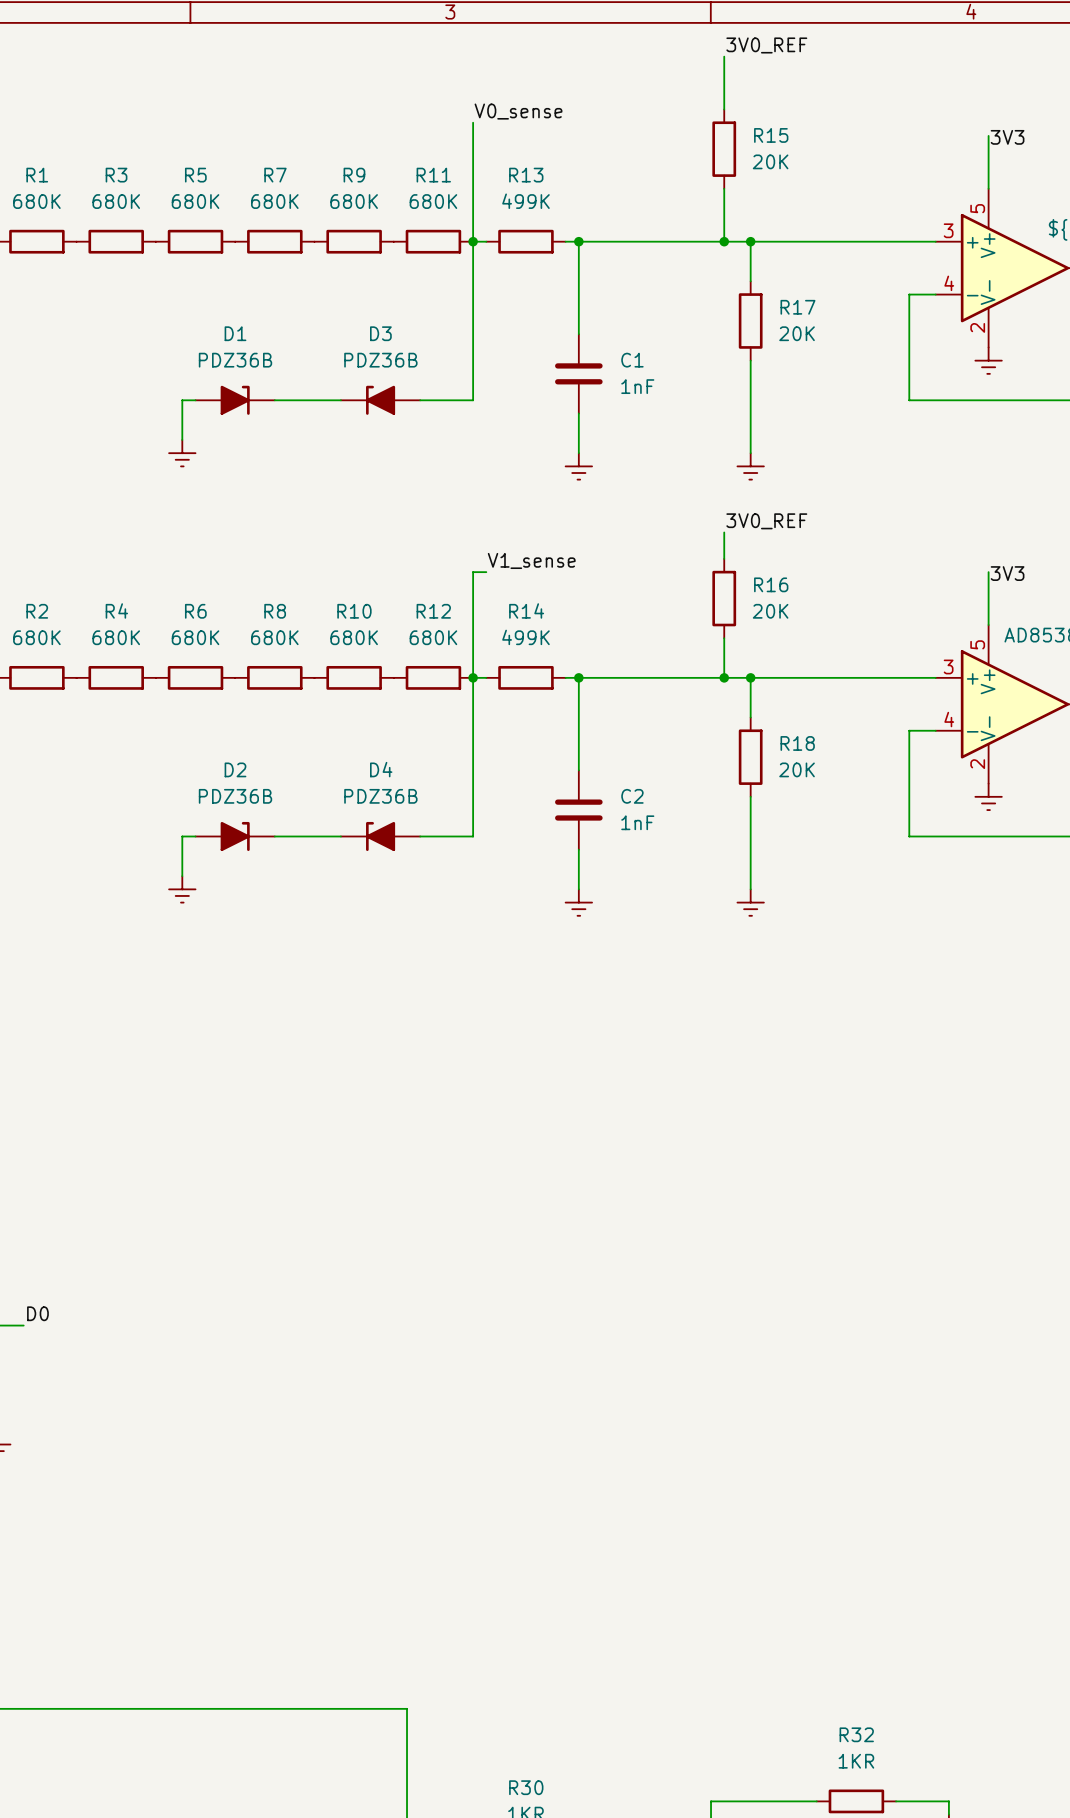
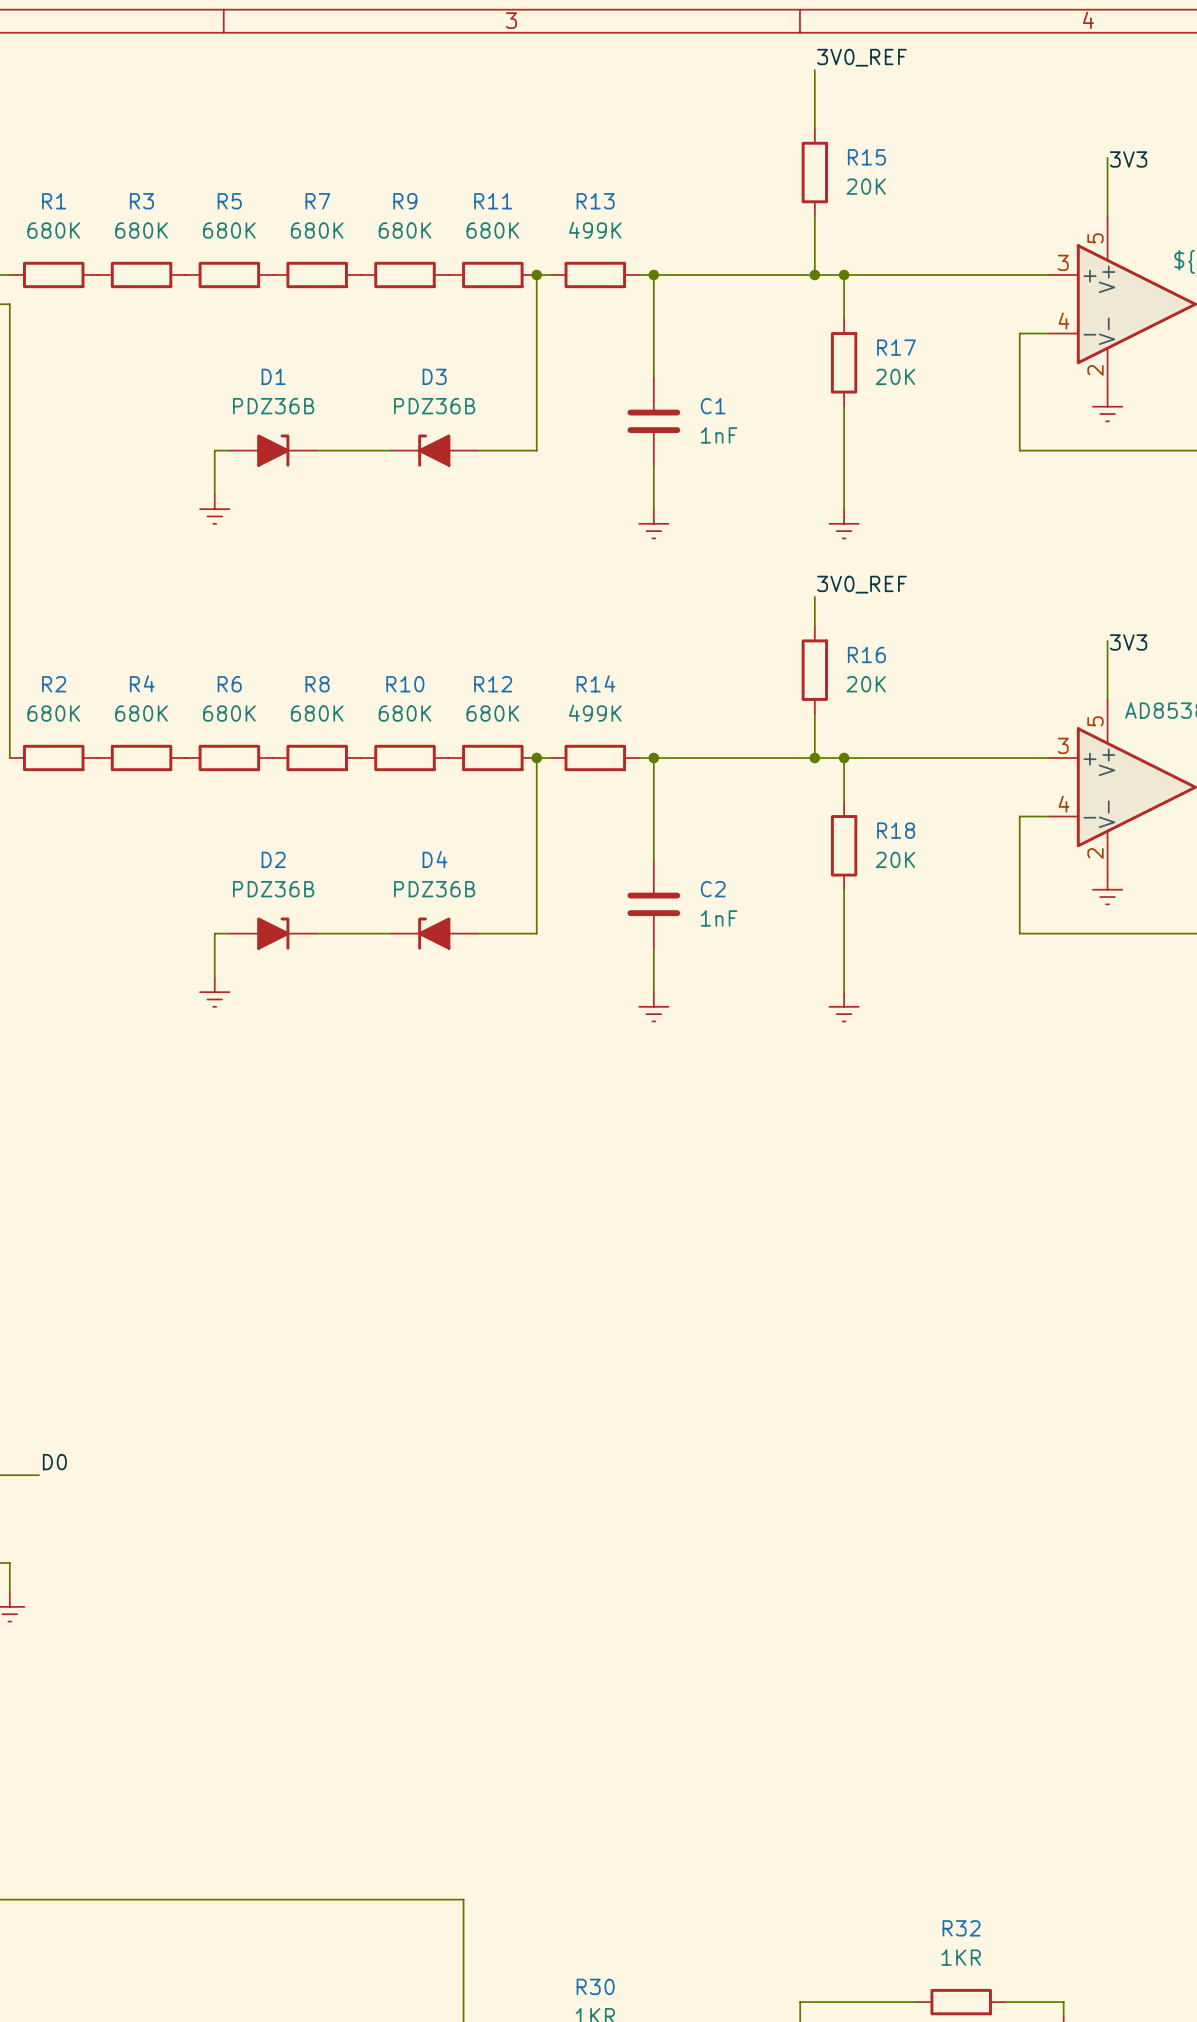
label: V0_sense (518, 111) -> none
wire: (473, 122) (473, 241) -> none
label: V1_sense (531, 560) -> none
wire: (486, 572) (473, 572) (473, 677) -> none

